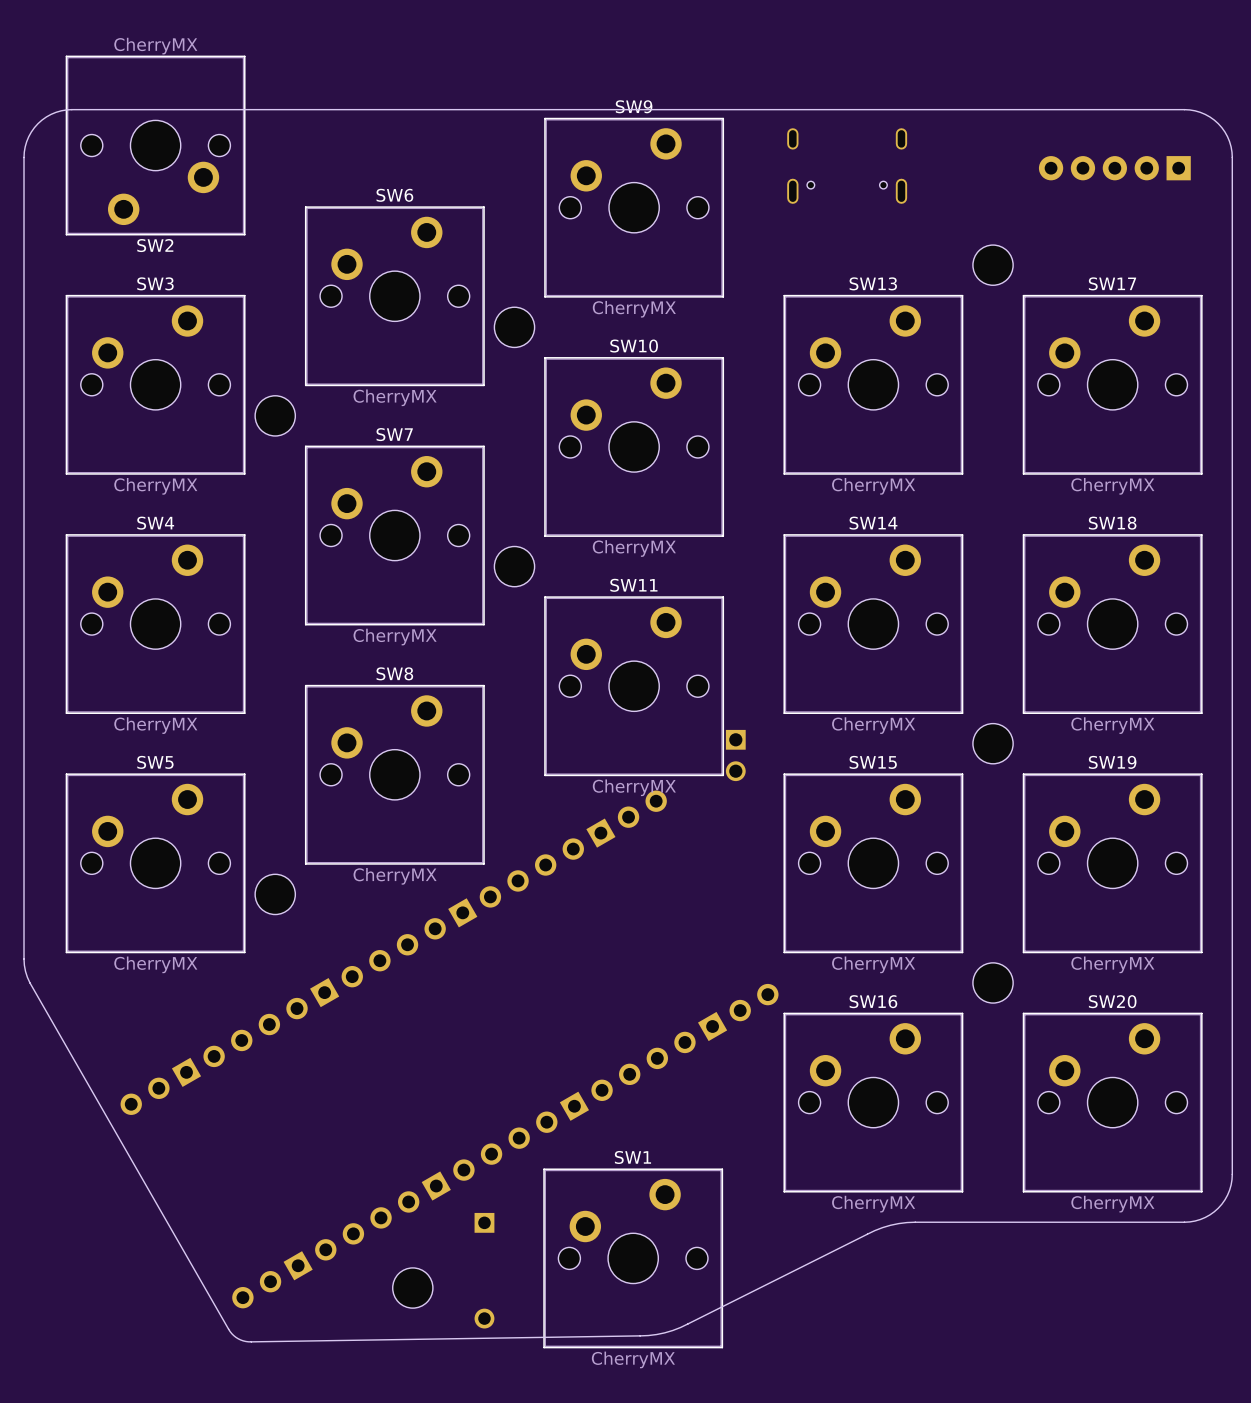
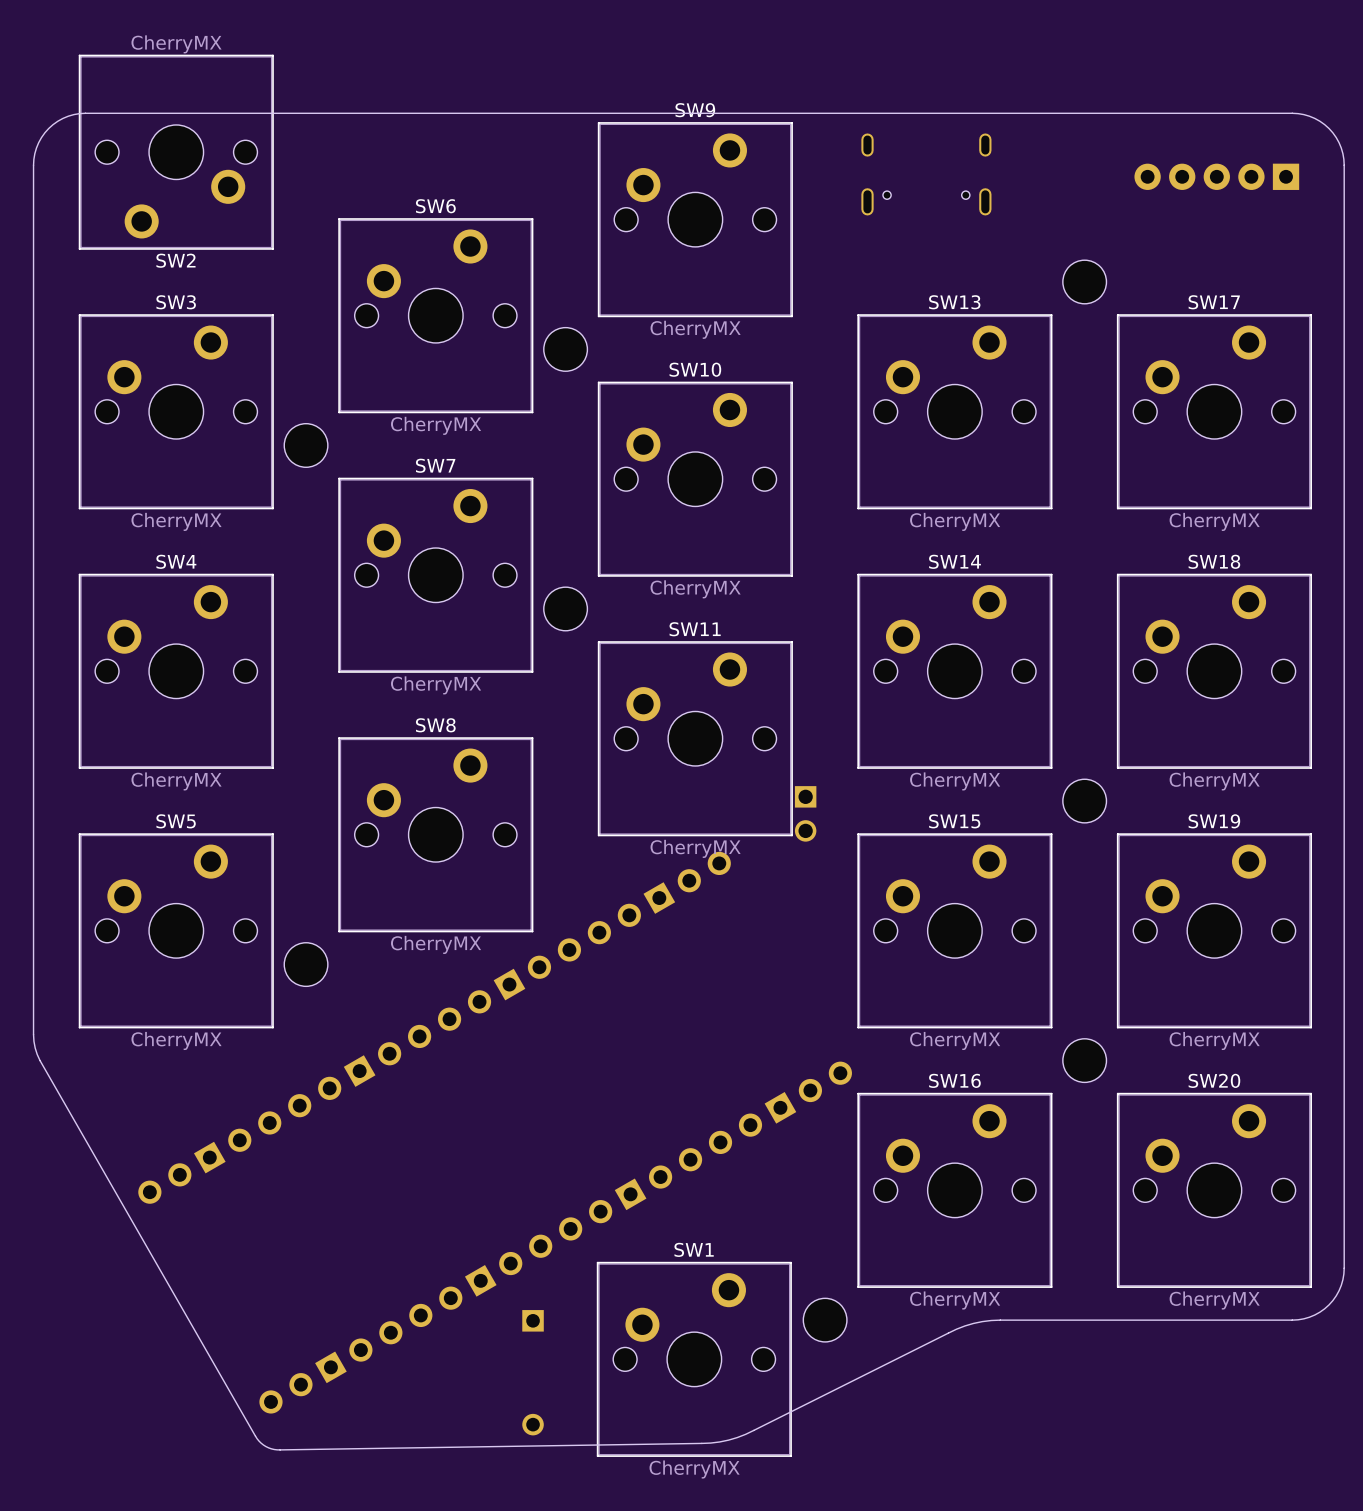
part: none -> (825, 1320)
part: (412, 1288) -> none

